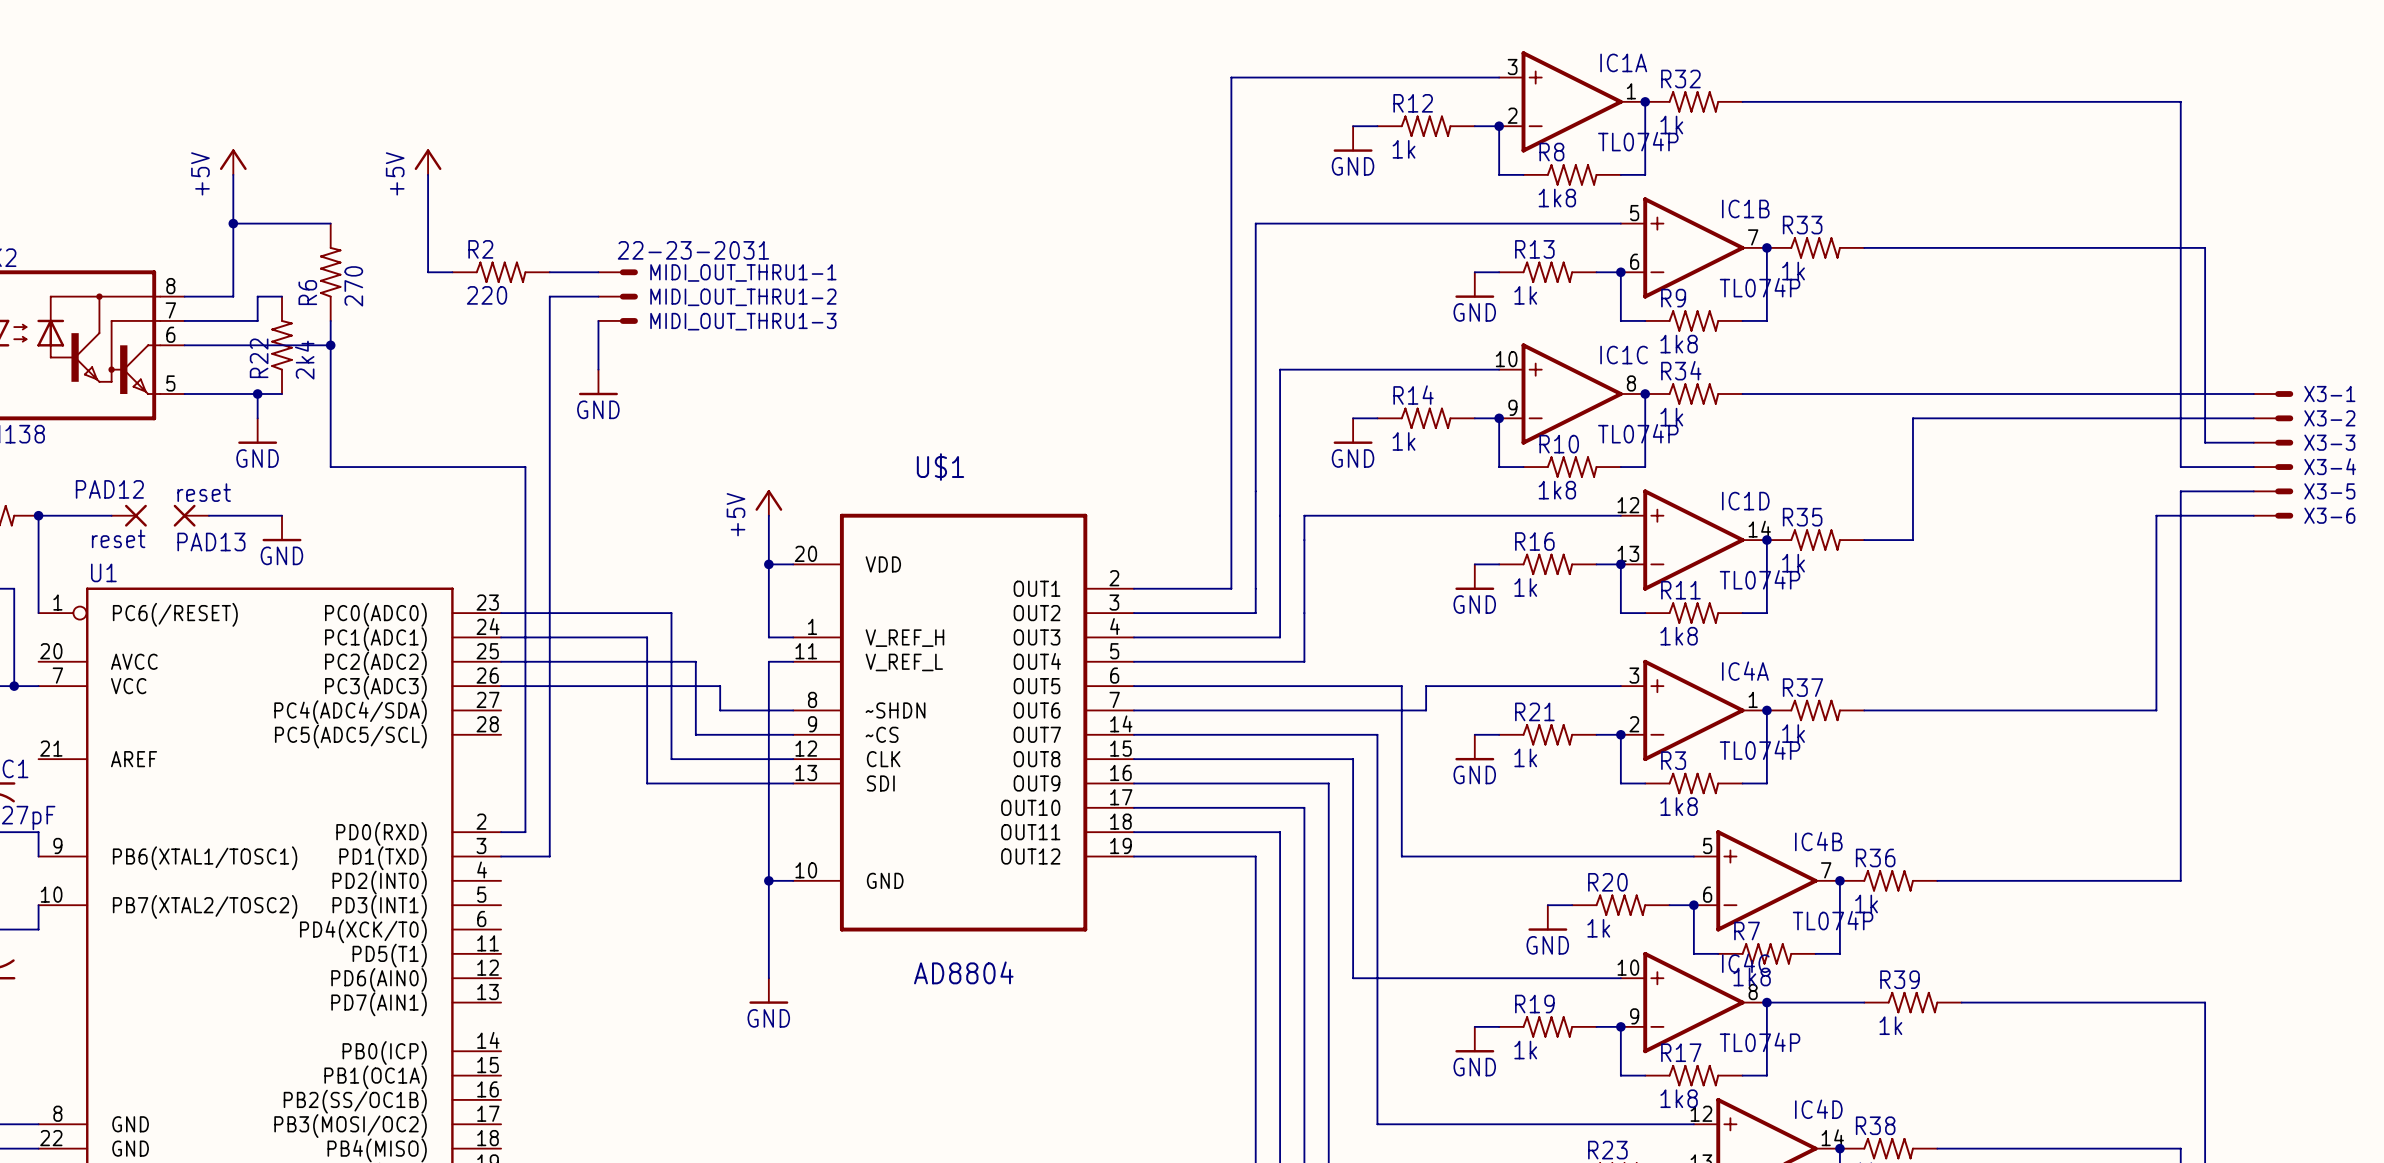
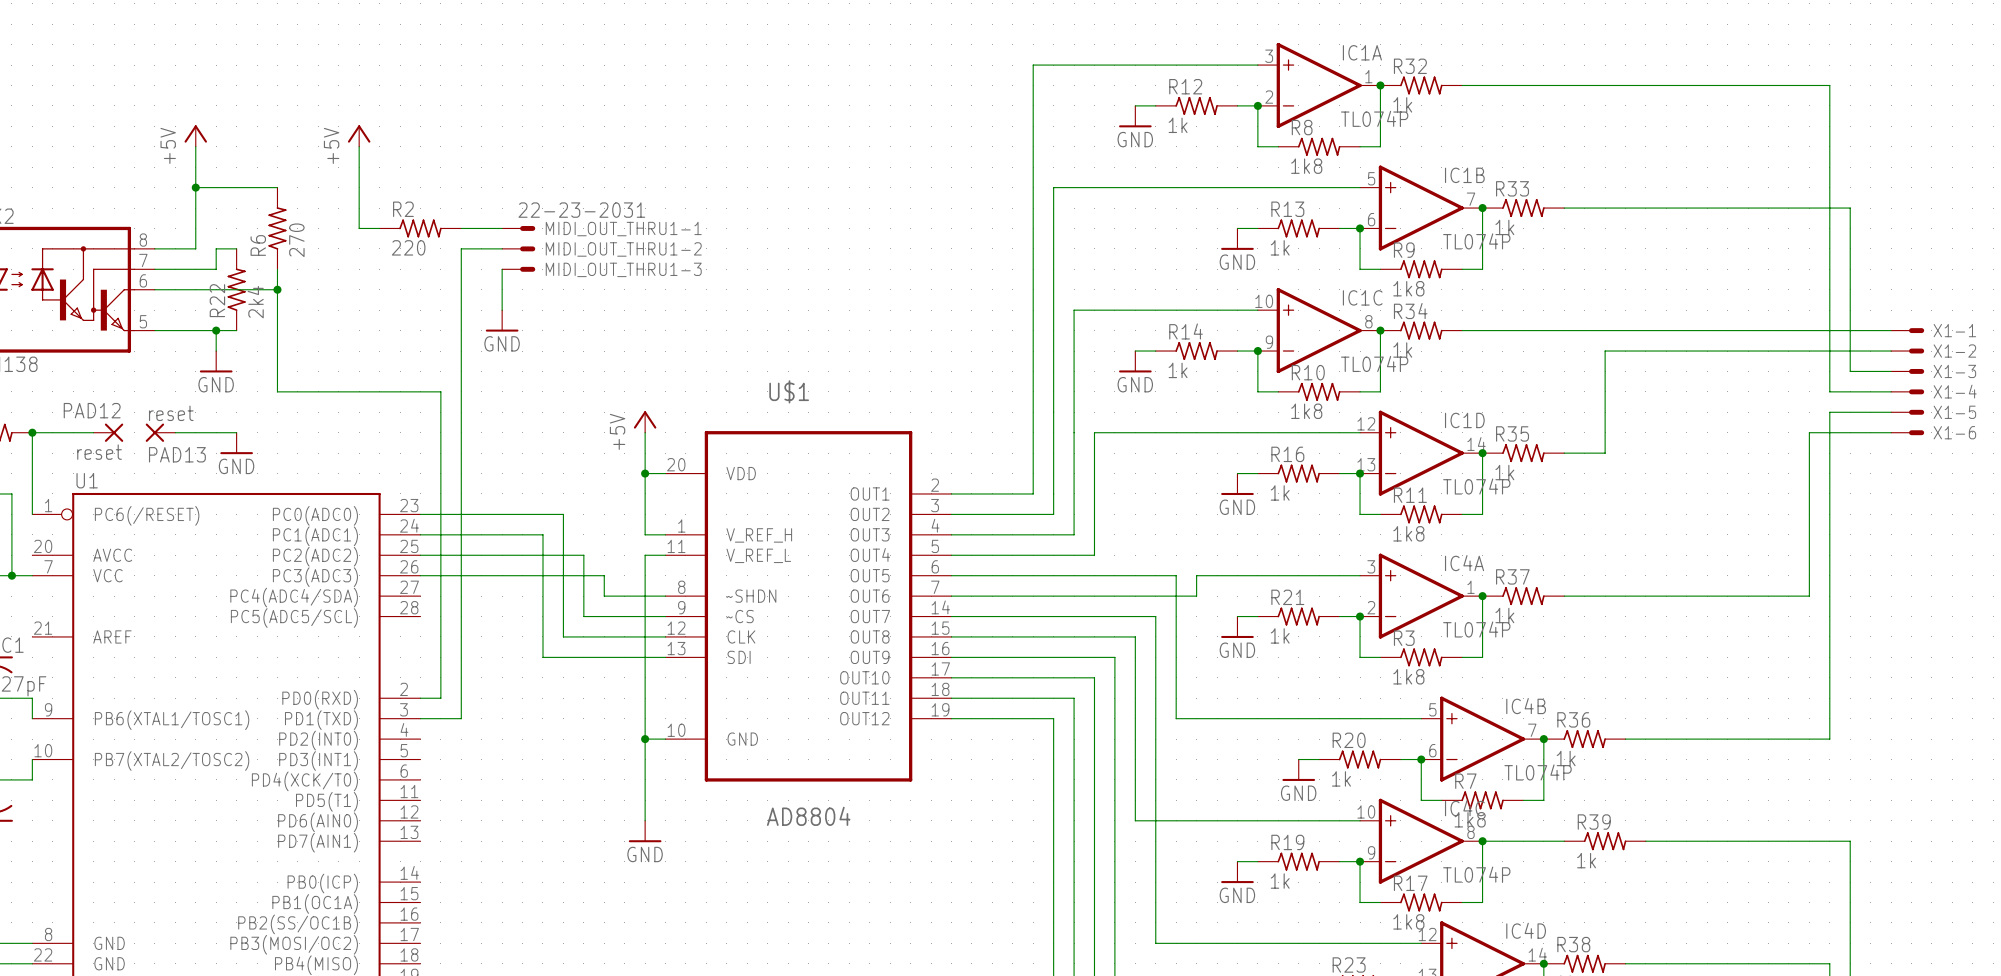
X3-1 name: X3-1 (2329, 394) -> X1-1 (1954, 330)
X3-2 name: X3-2 (2329, 418) -> X1-2 (1954, 351)
X3-3 name: X3-3 (2329, 442) -> X1-3 (1954, 371)
X3-4 name: X3-4 (2330, 466) -> X1-4 (1955, 391)
X3-5 name: X3-5 (2329, 491) -> X1-5 (1954, 412)
X3-6 name: X3-6 (2329, 515) -> X1-6 (1954, 432)

